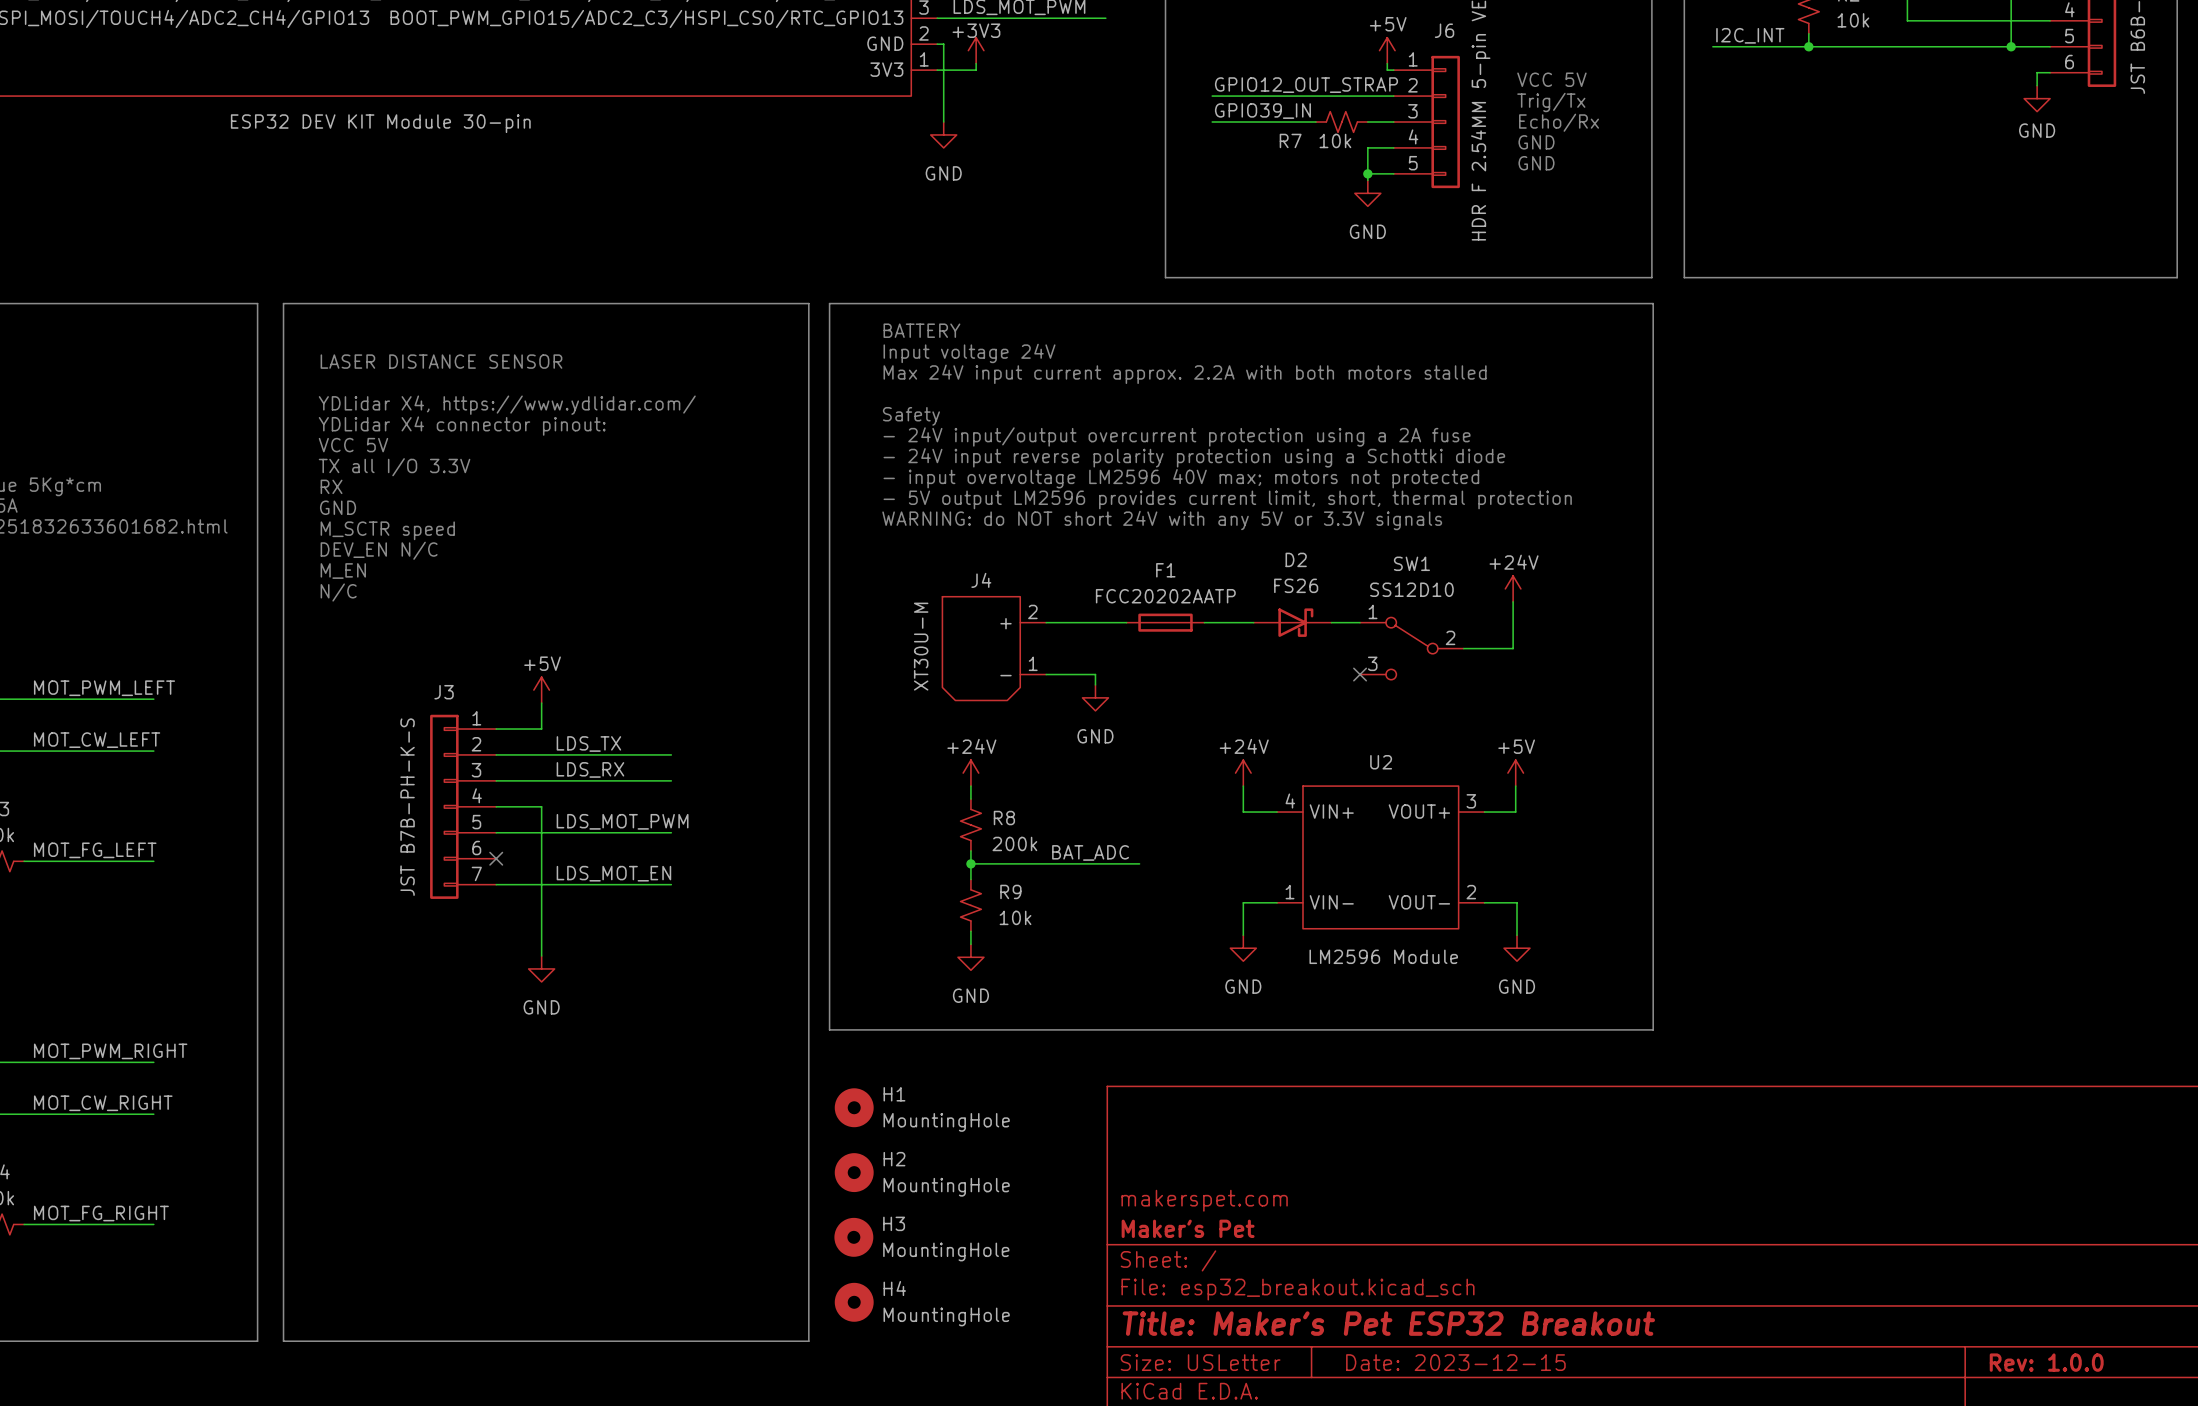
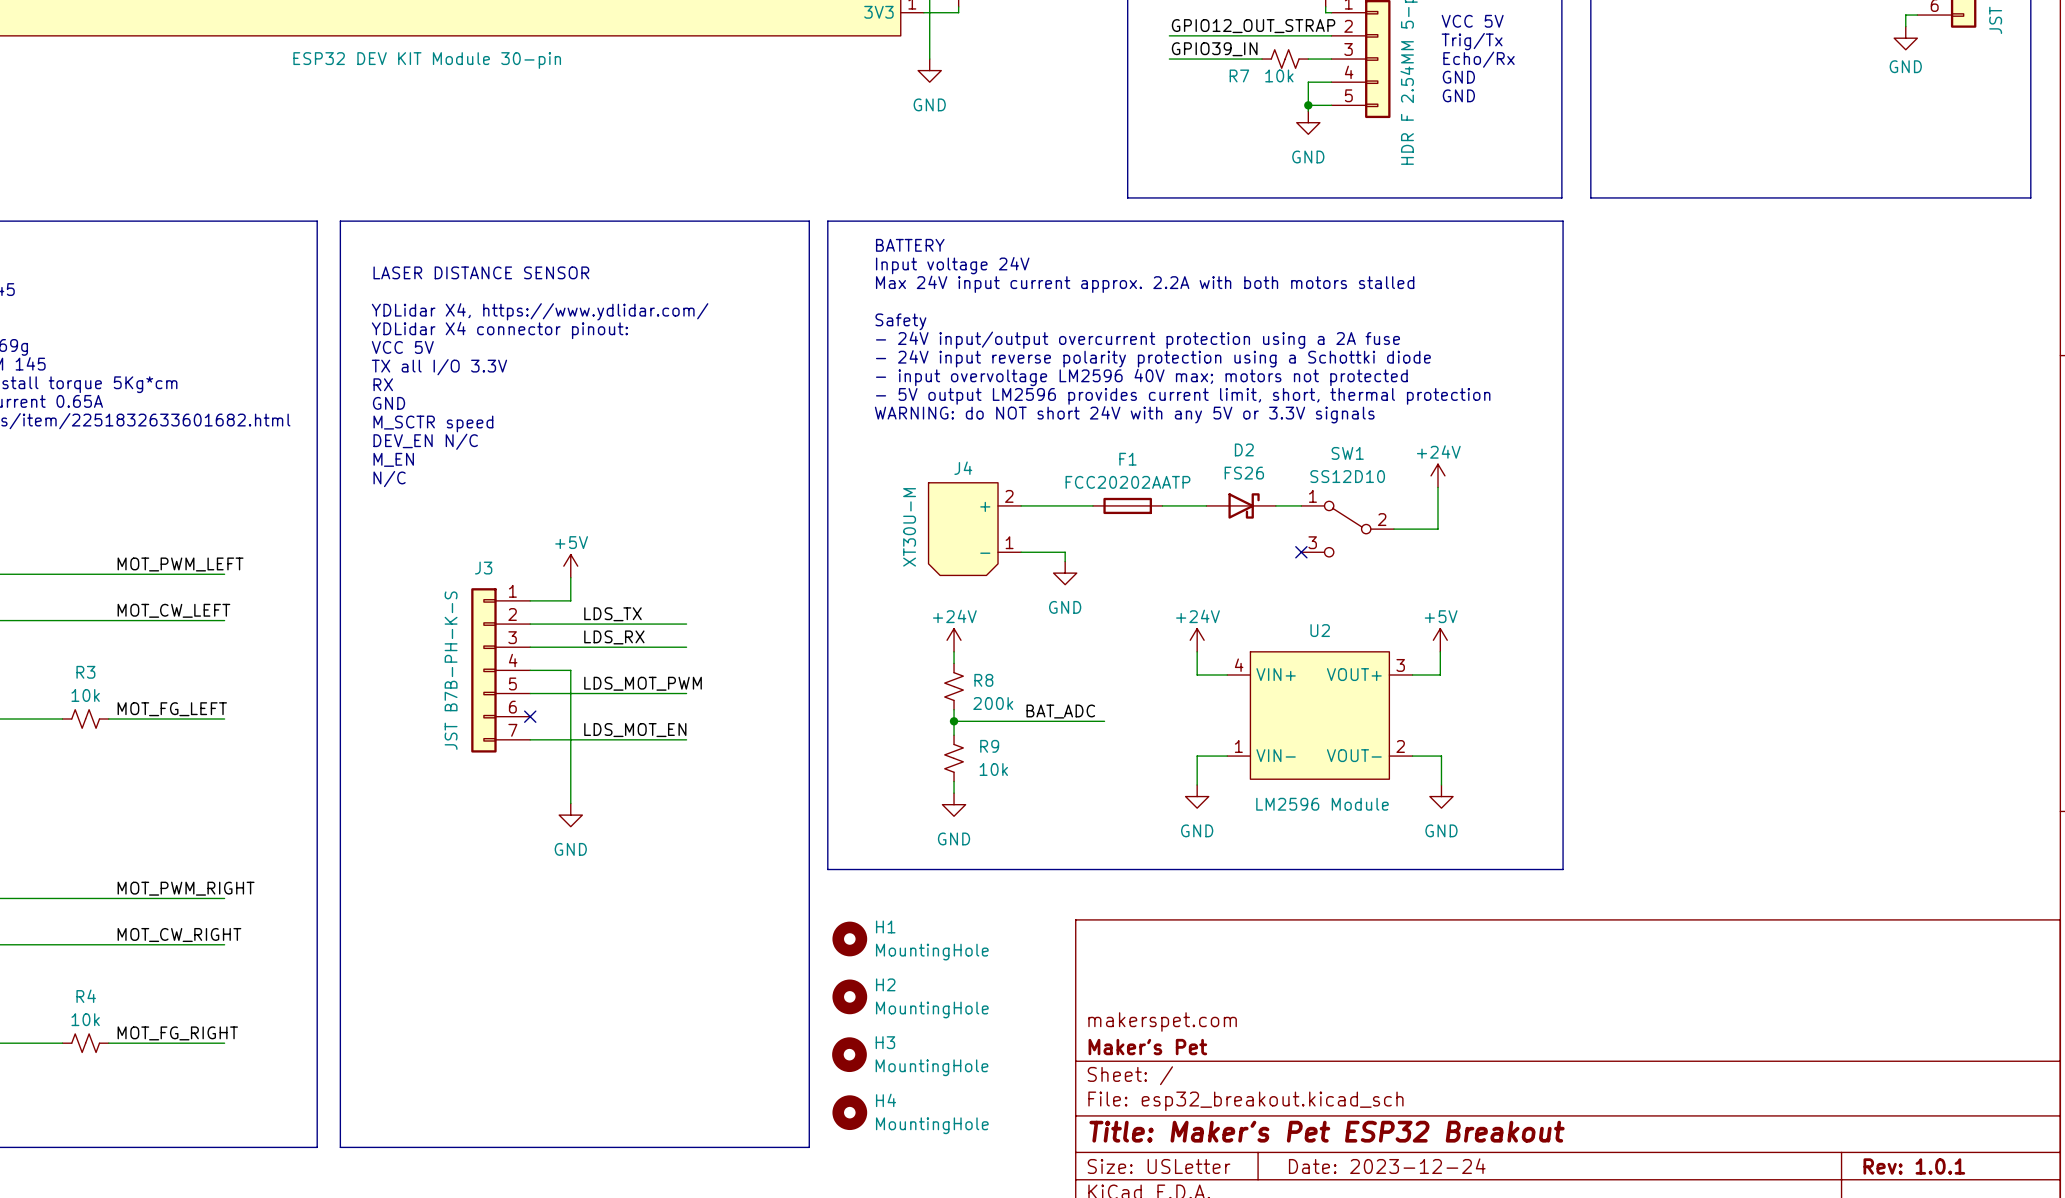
title block: Date: 2023-12-15 (1455, 1362) -> Date: 2023-12-24 (1387, 1166)
title block: Rev: 1.0.0 (2046, 1362) -> Rev: 1.0.1 (1914, 1166)

